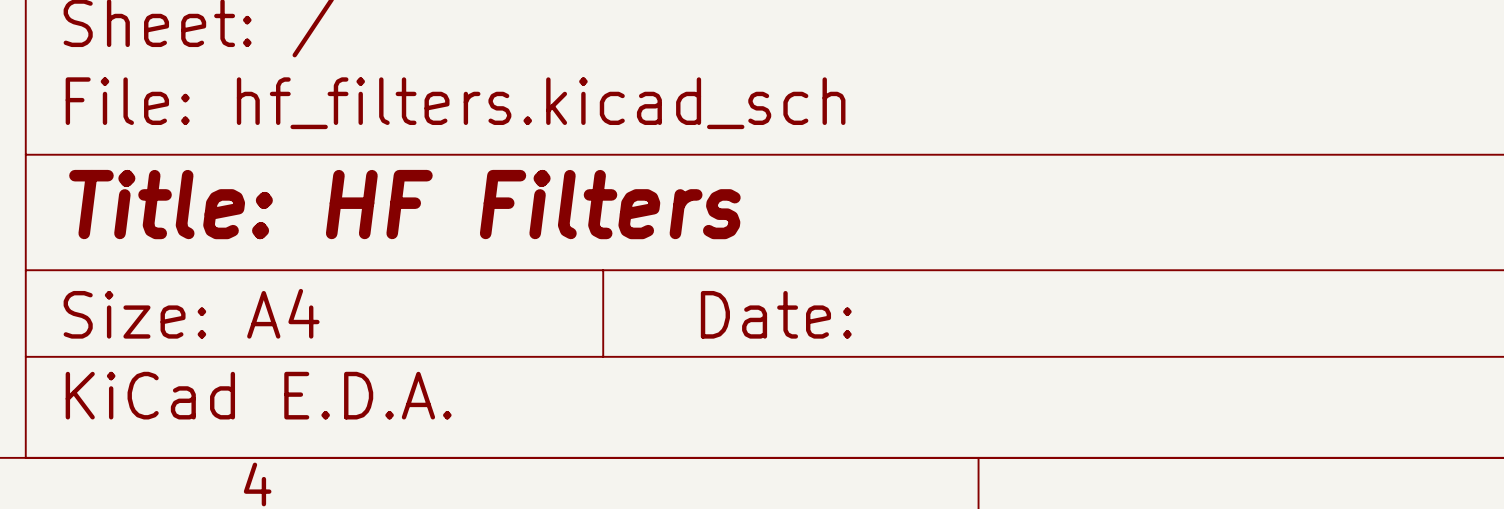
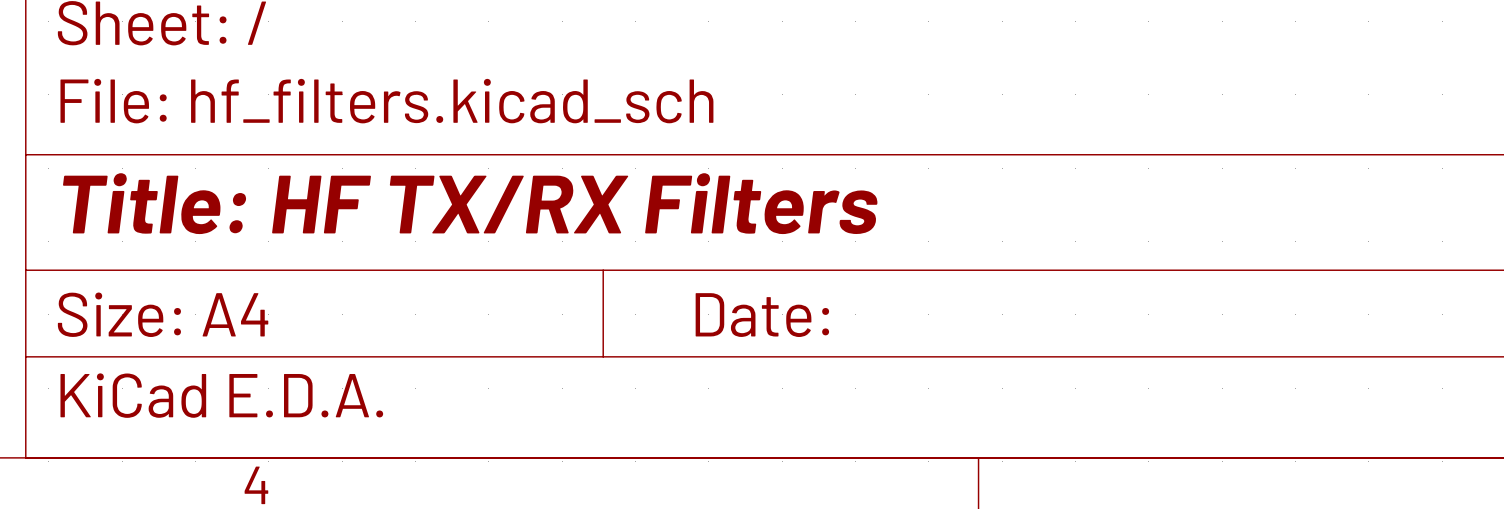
title block: Title: HF Filters (404, 204) -> Title: HF TX/RX Filters (470, 203)

